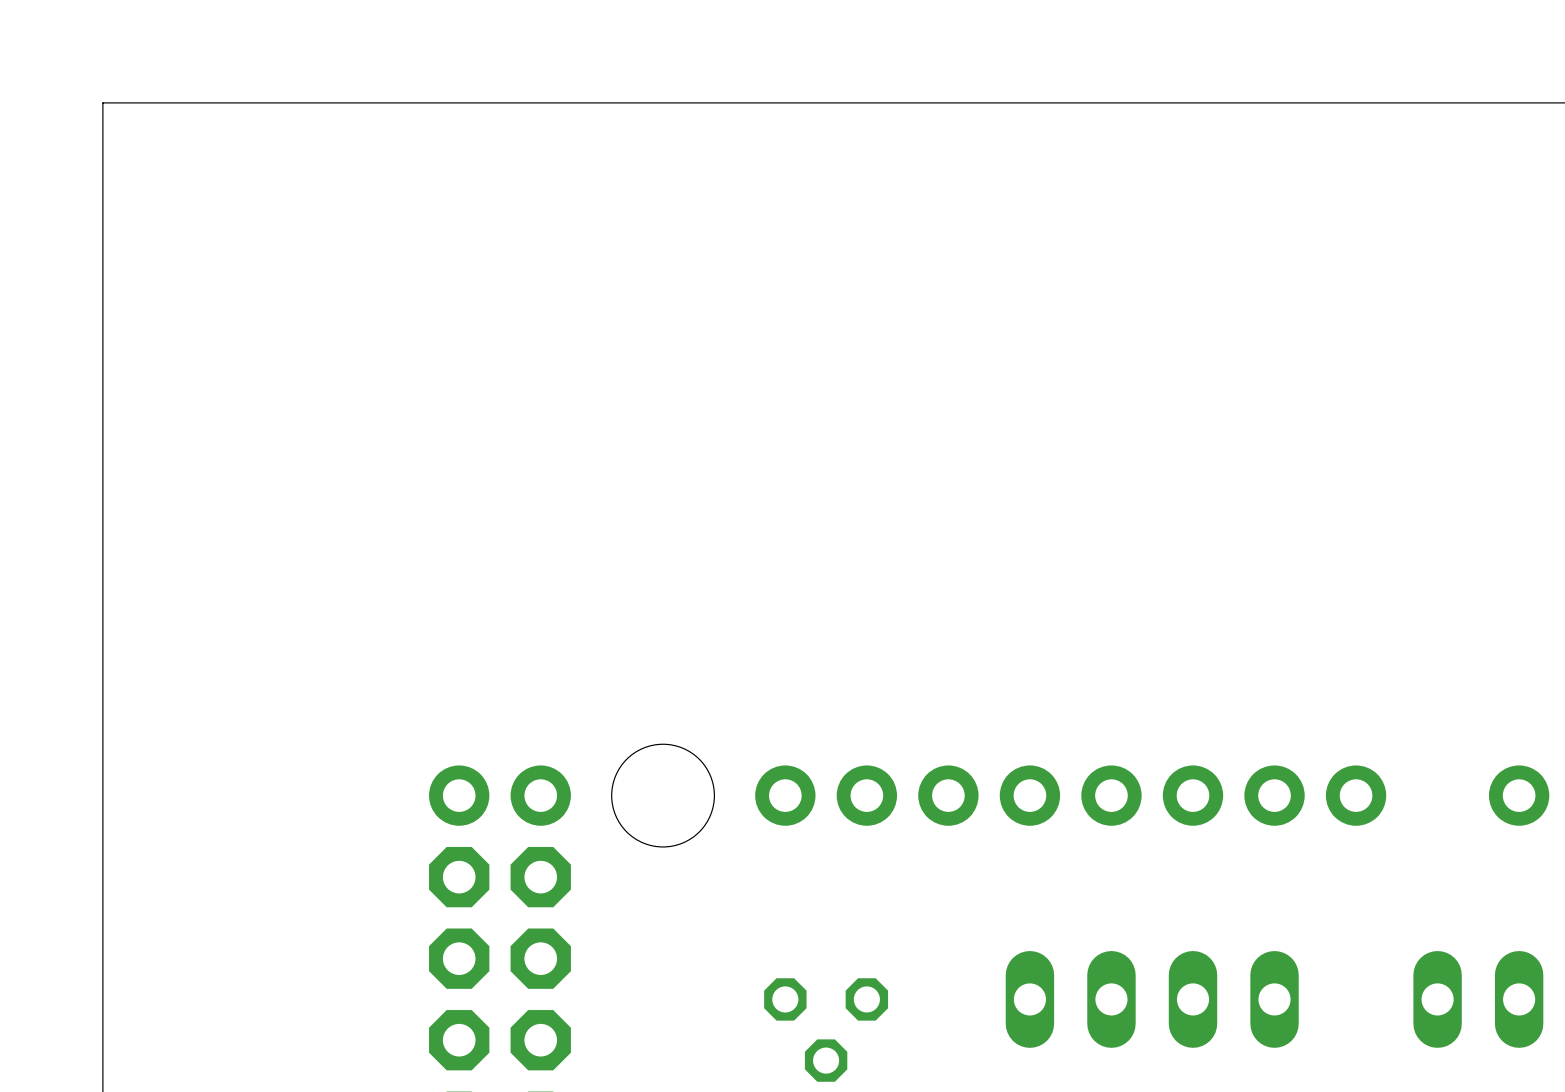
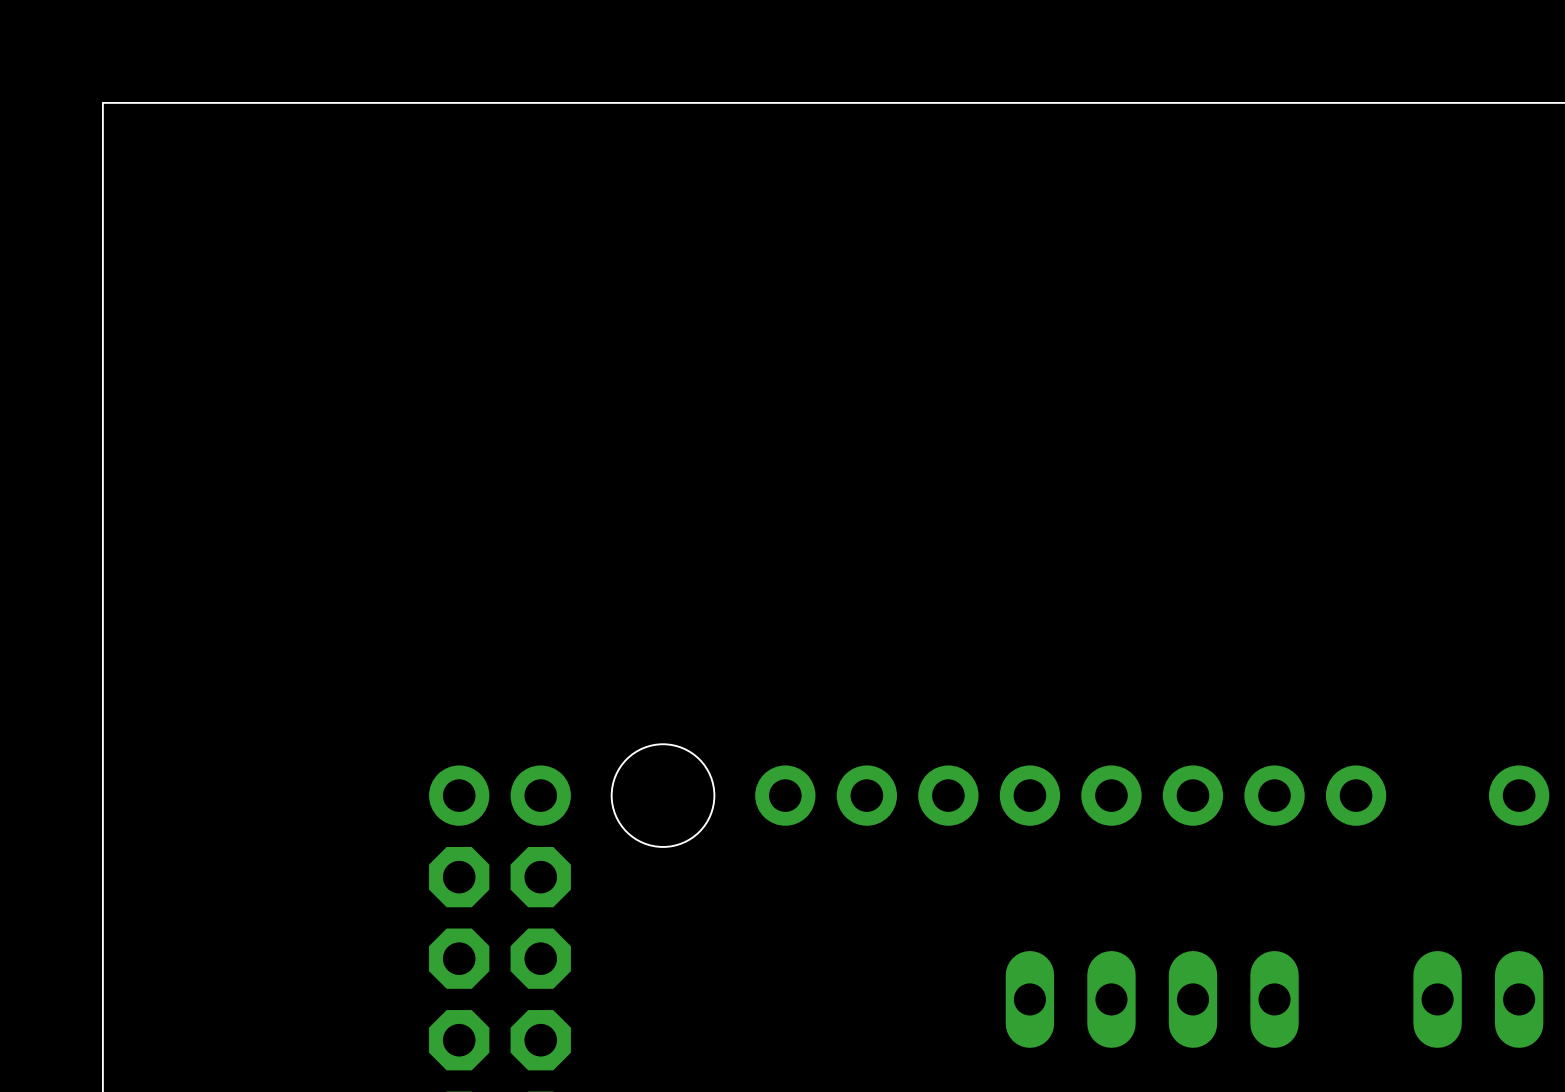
part: (826, 1030) -> none

